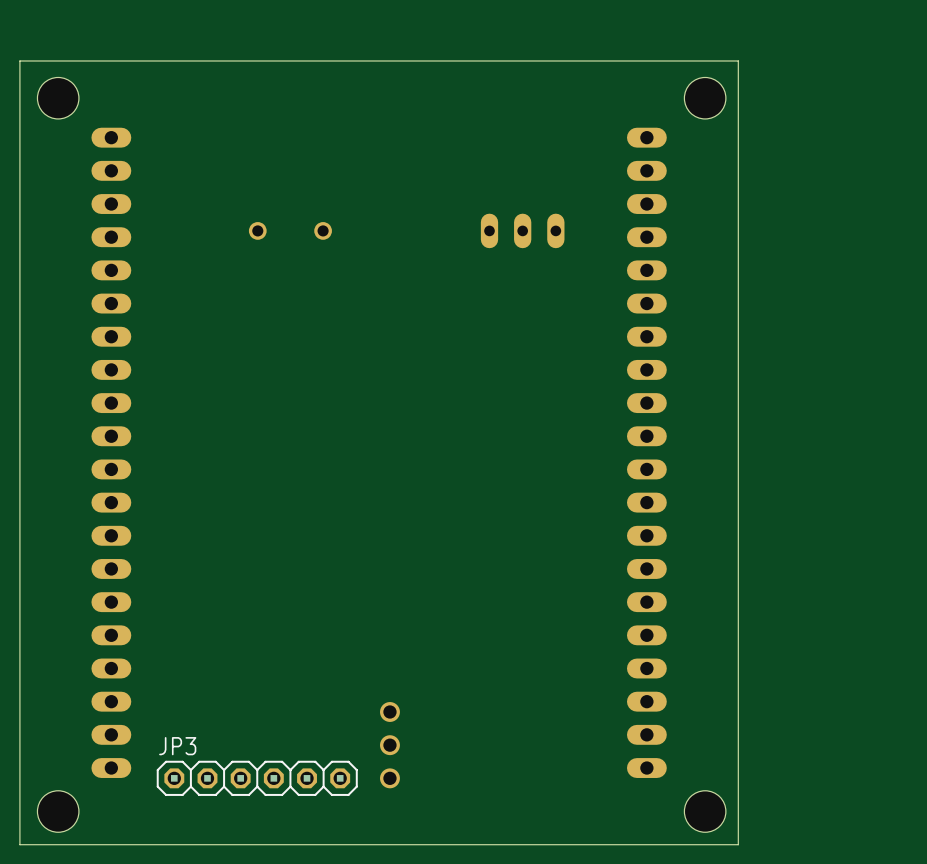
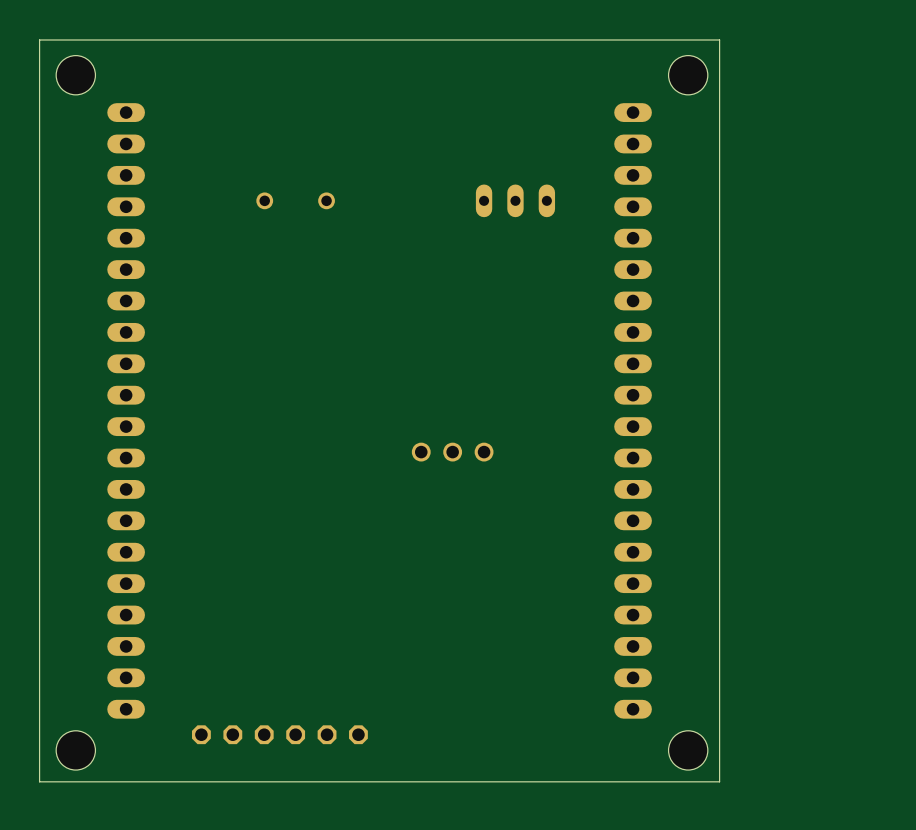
part rotation: 0° (389, 745) -> 90° clockwise (452, 452)
part position: (389, 745) -> (452, 452)
JP3 side: bottom (257, 778) -> top (279, 734)

